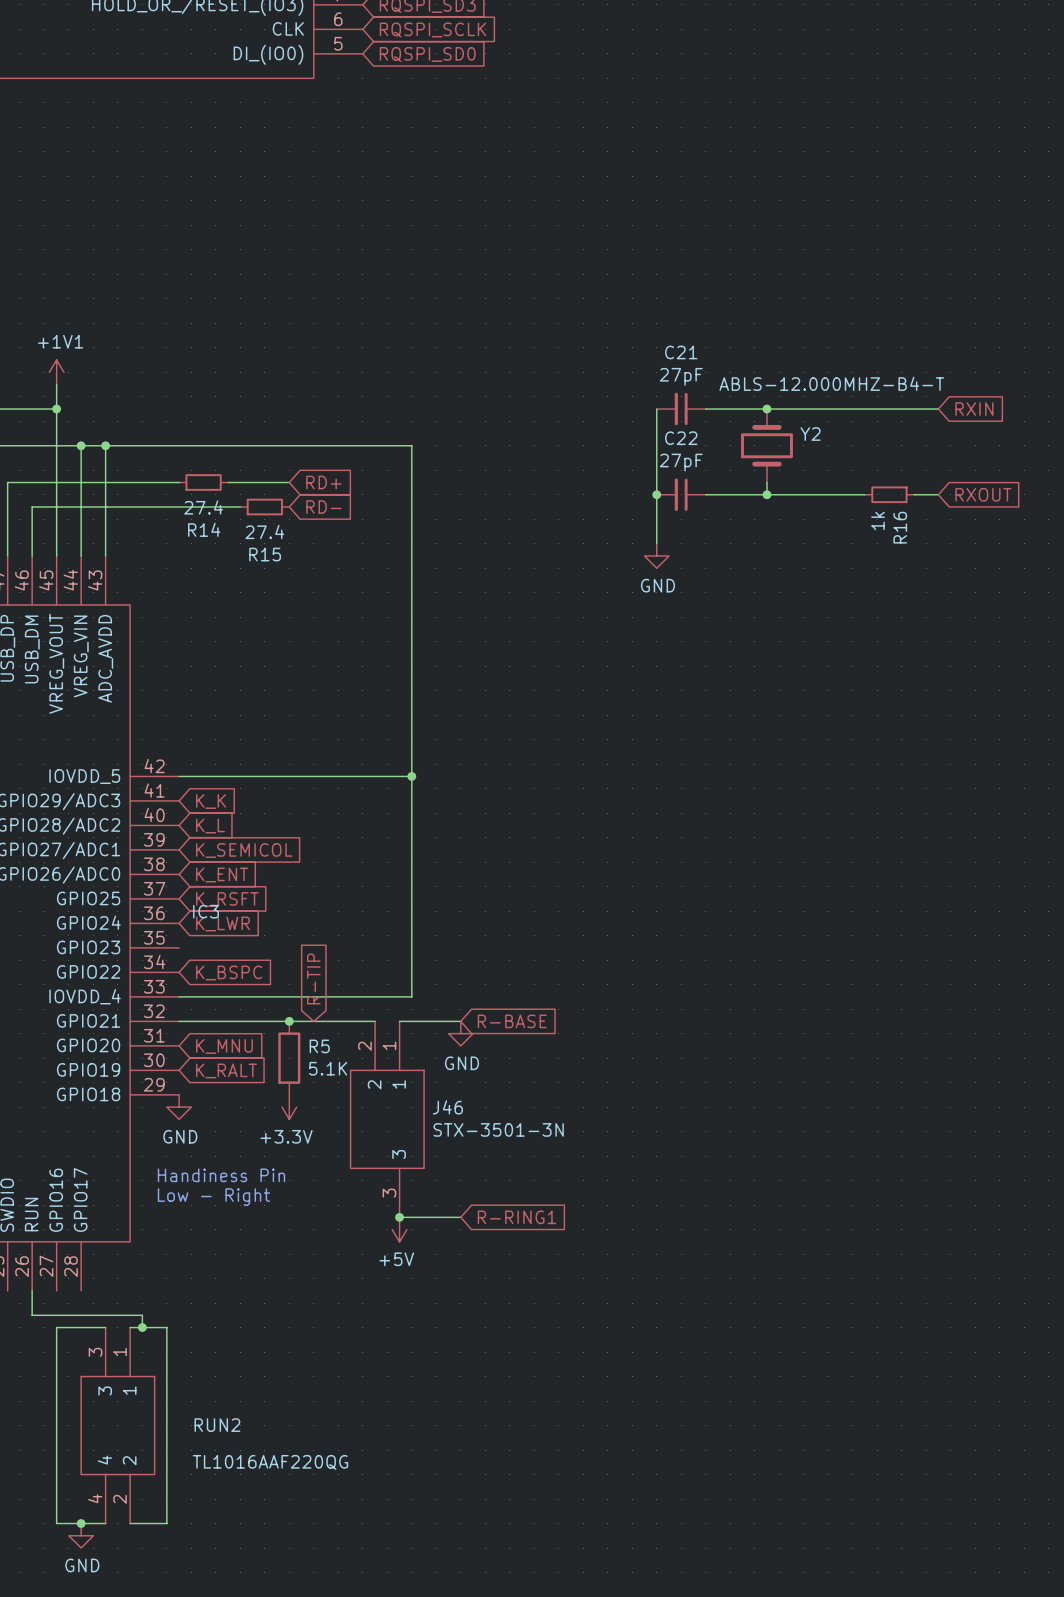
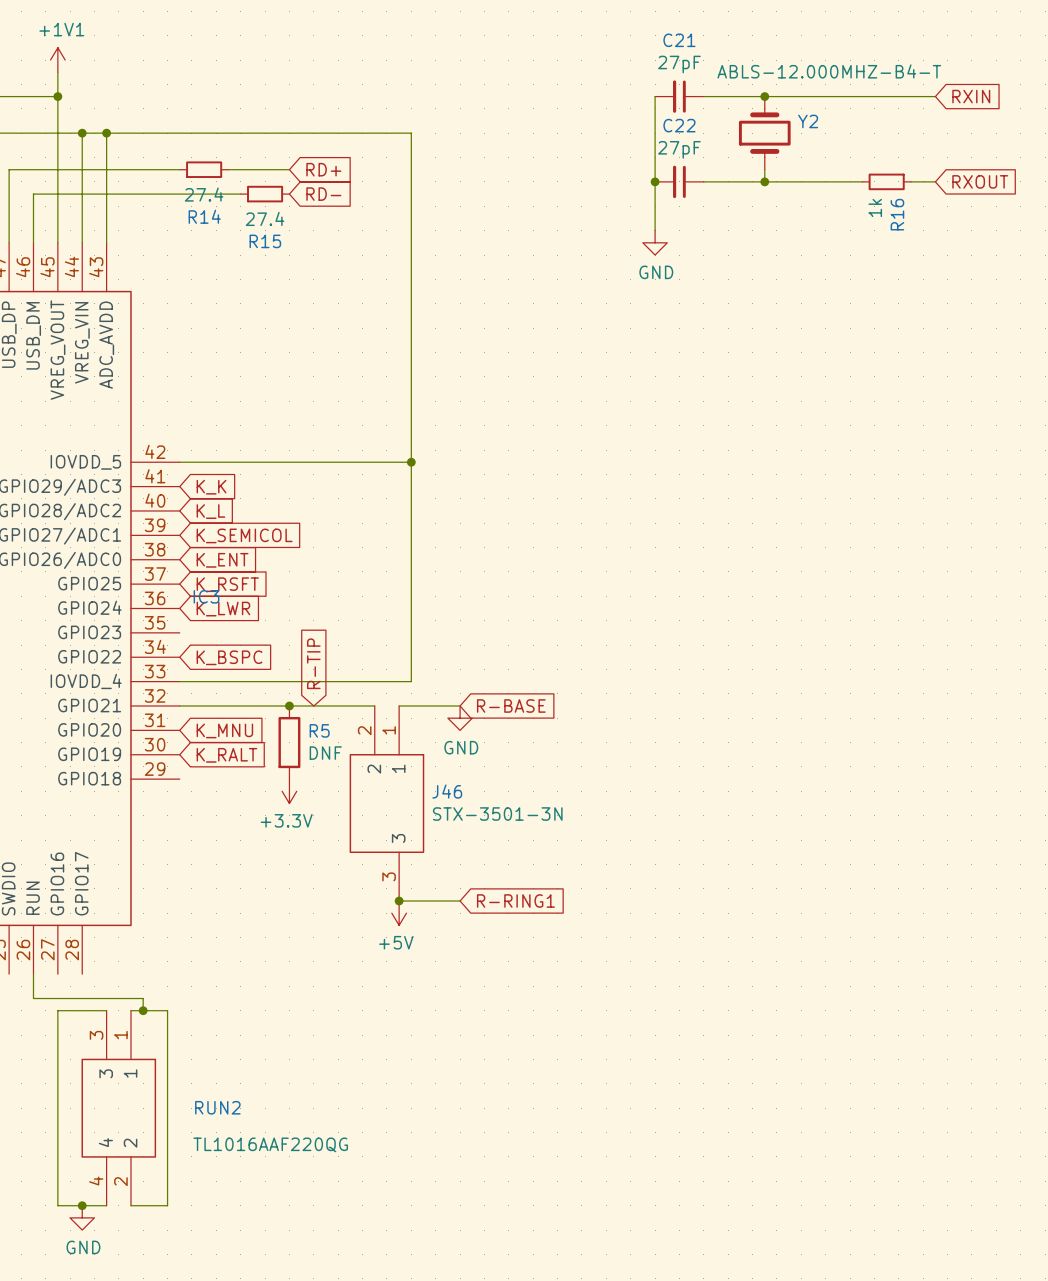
R5 value: 5.1K (328, 1068) -> DNF (325, 753)
power symbol: GND (179, 1107) -> none
text: Handiness Pin (221, 1175) -> none
text: Low - Right (213, 1197) -> none

